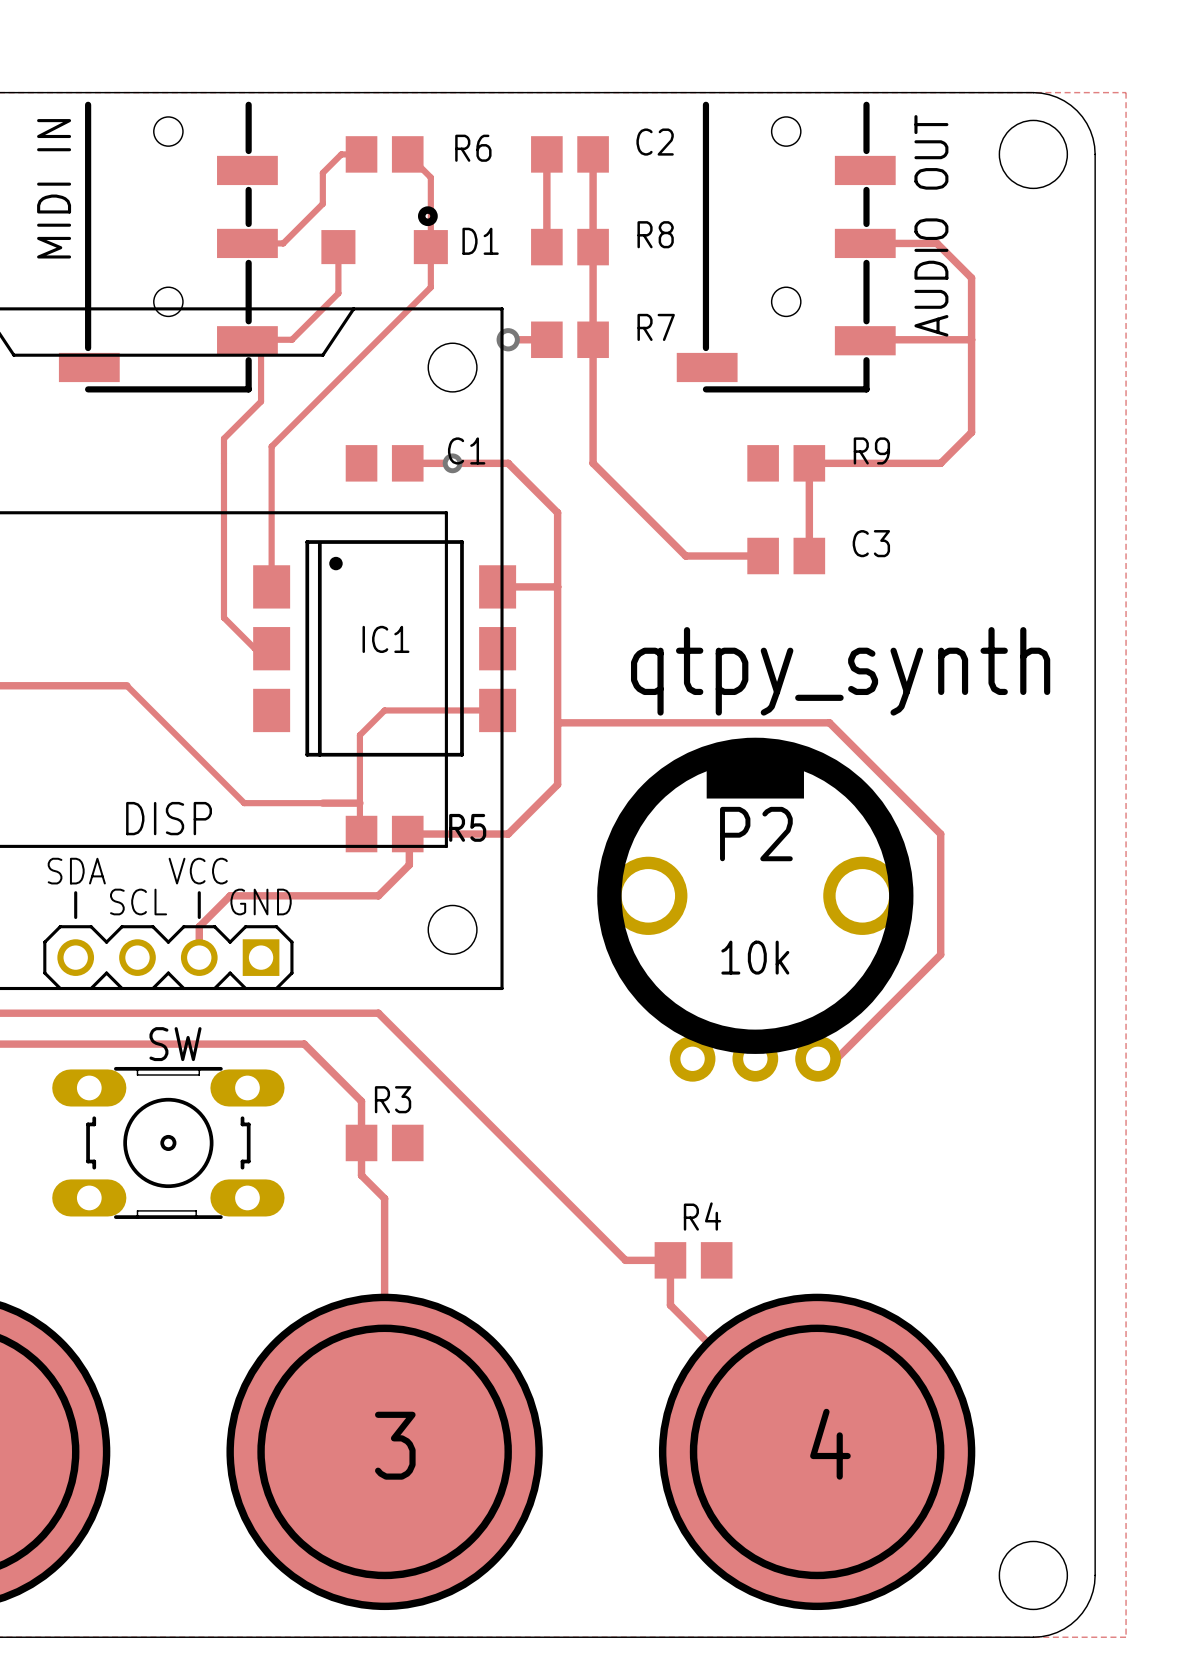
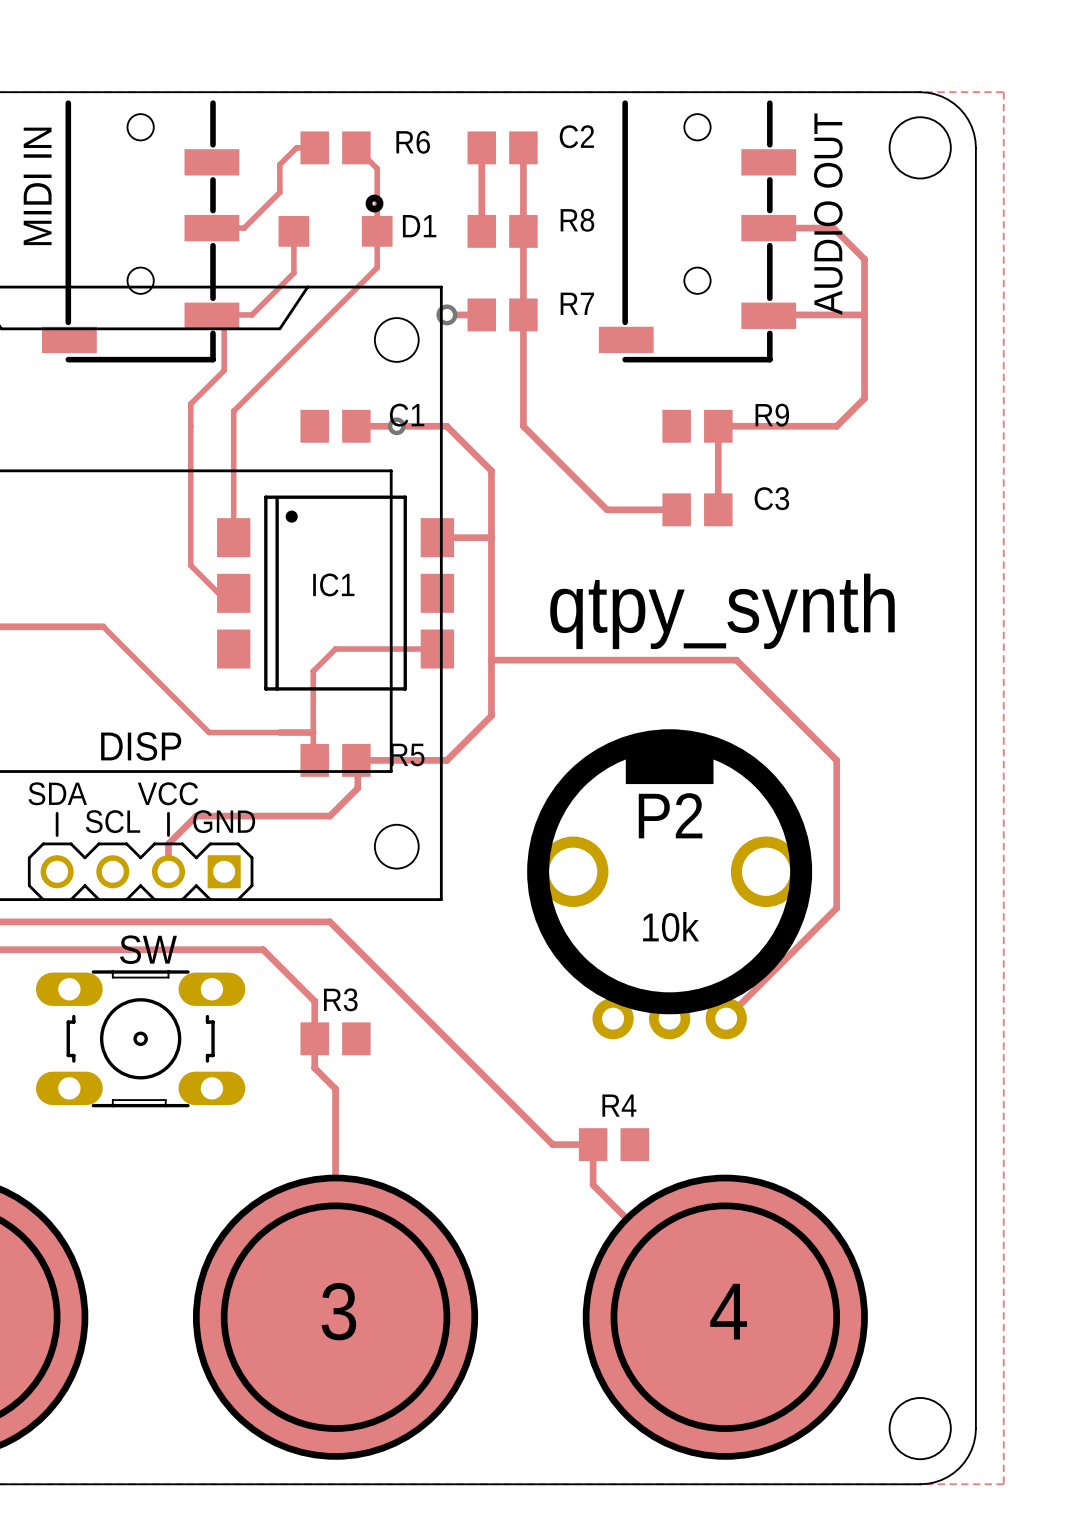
P2 position: (755, 909) -> (669, 884)
track: (940, 954) (836, 1058) (818, 1058) -> (836, 869) (836, 908) (726, 1018)

